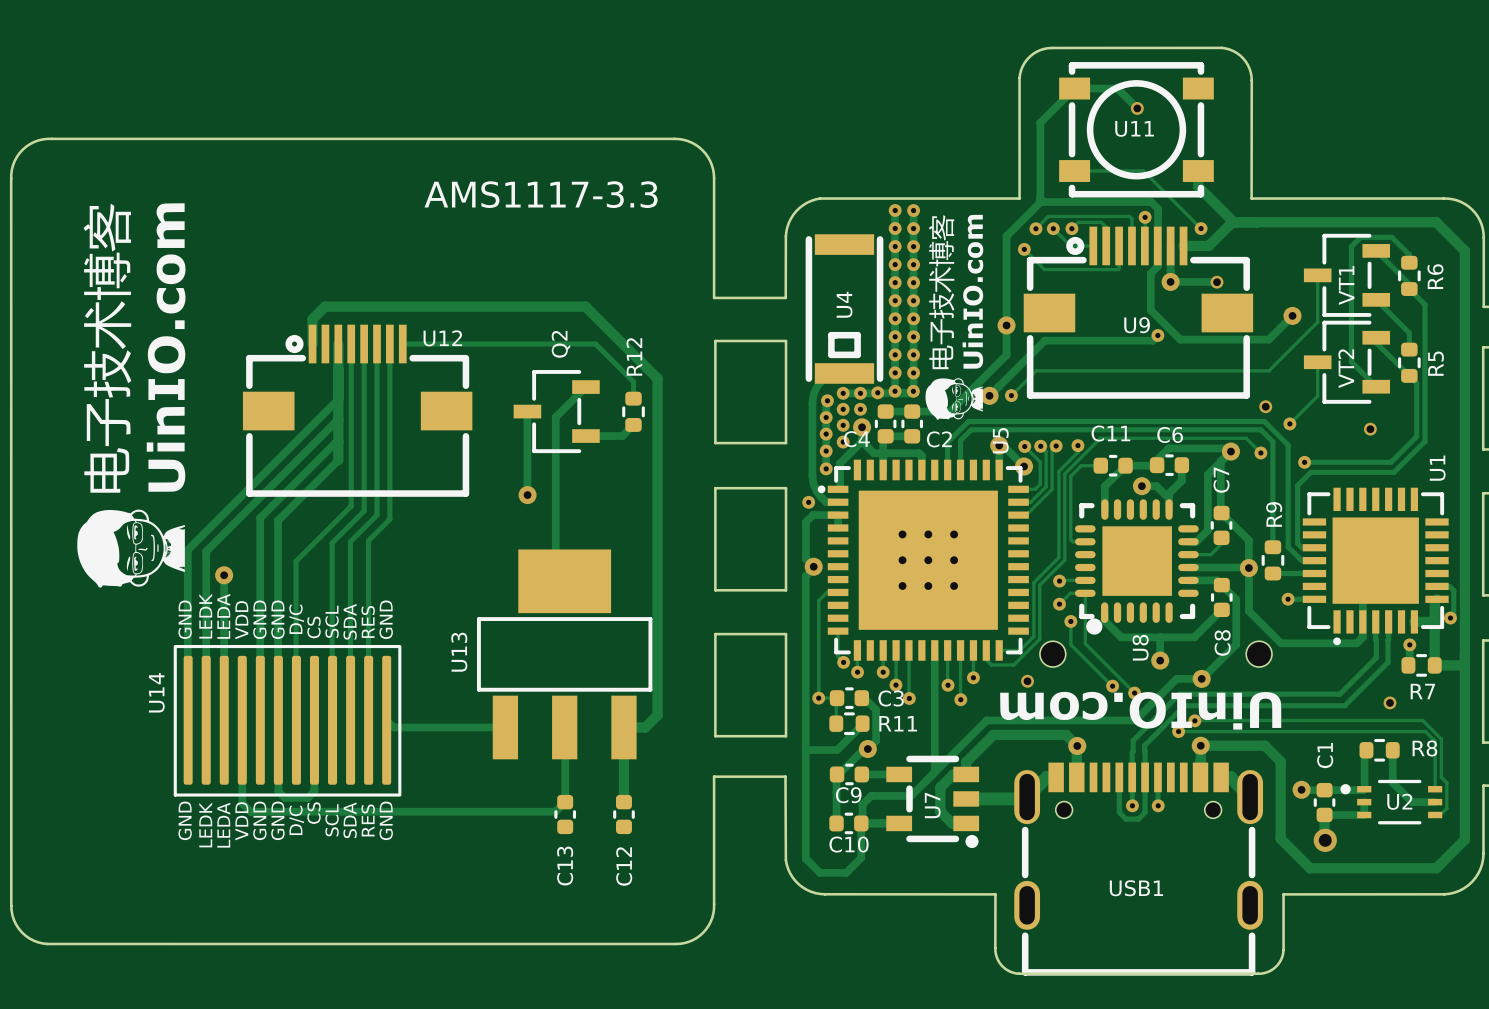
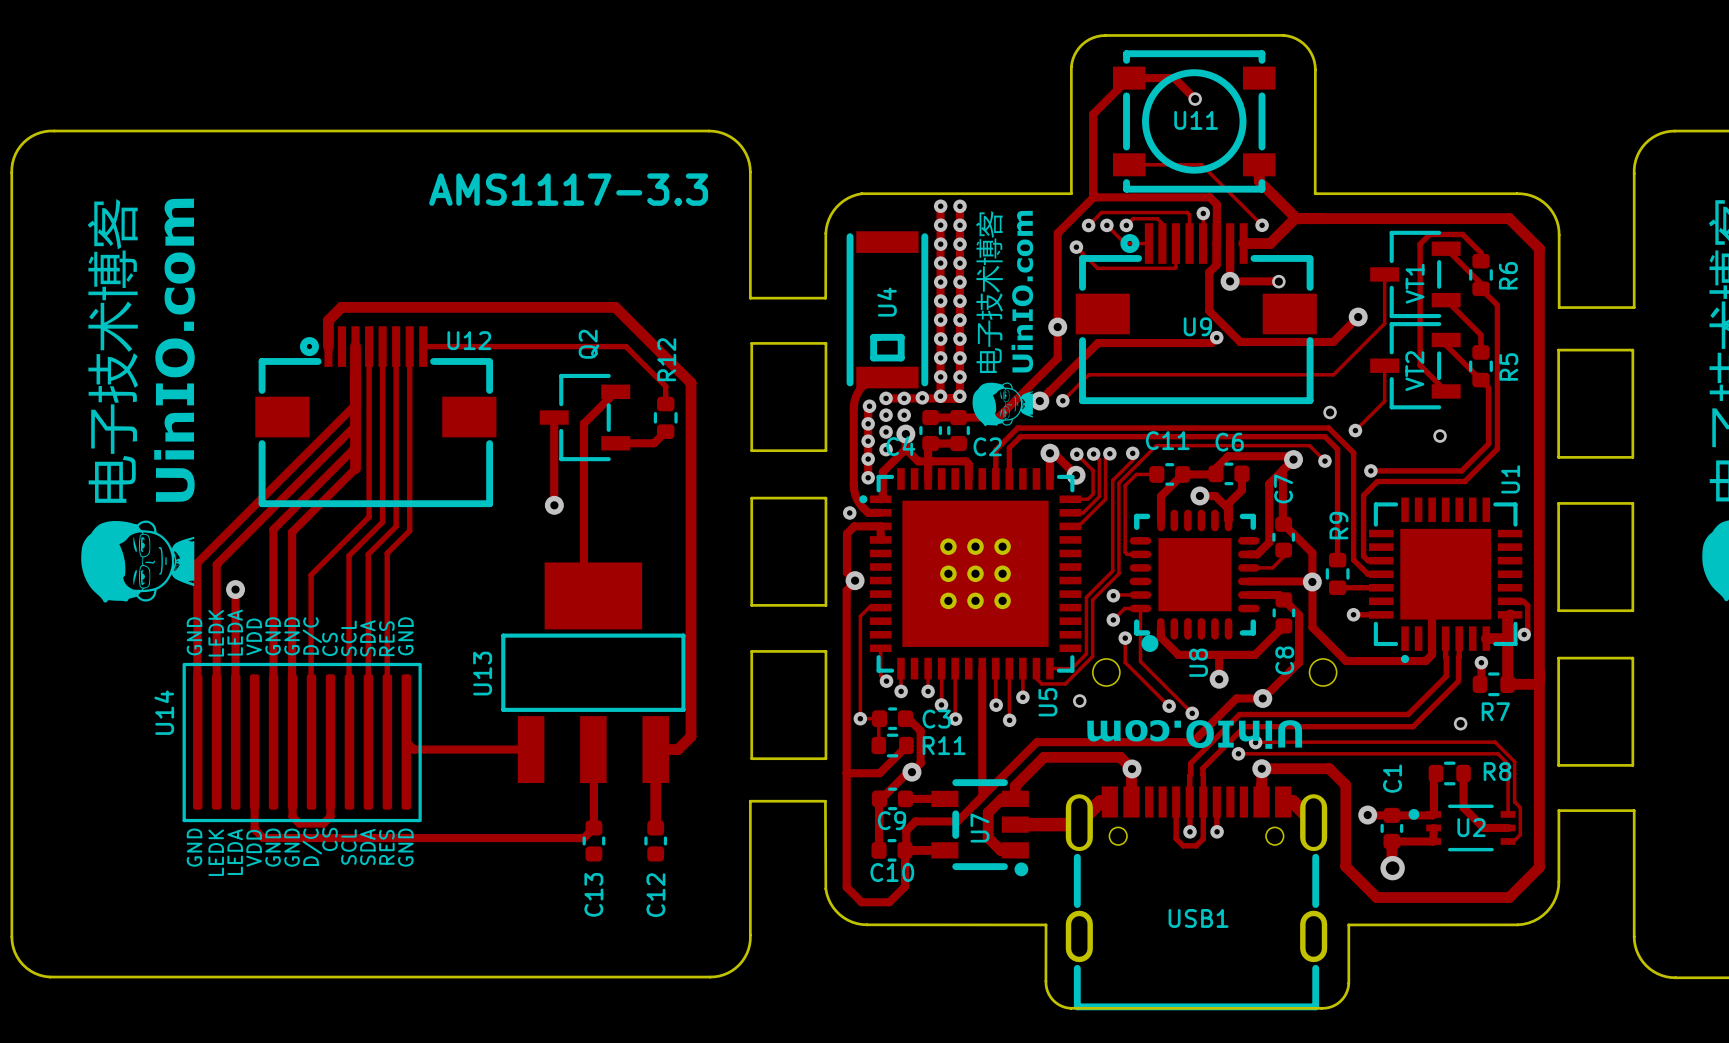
U5 name position: U5 (1000, 440) -> U5 (1047, 702)
drawing shape: [1000, 691, 1282, 730] -> [1087, 720, 1303, 749]

